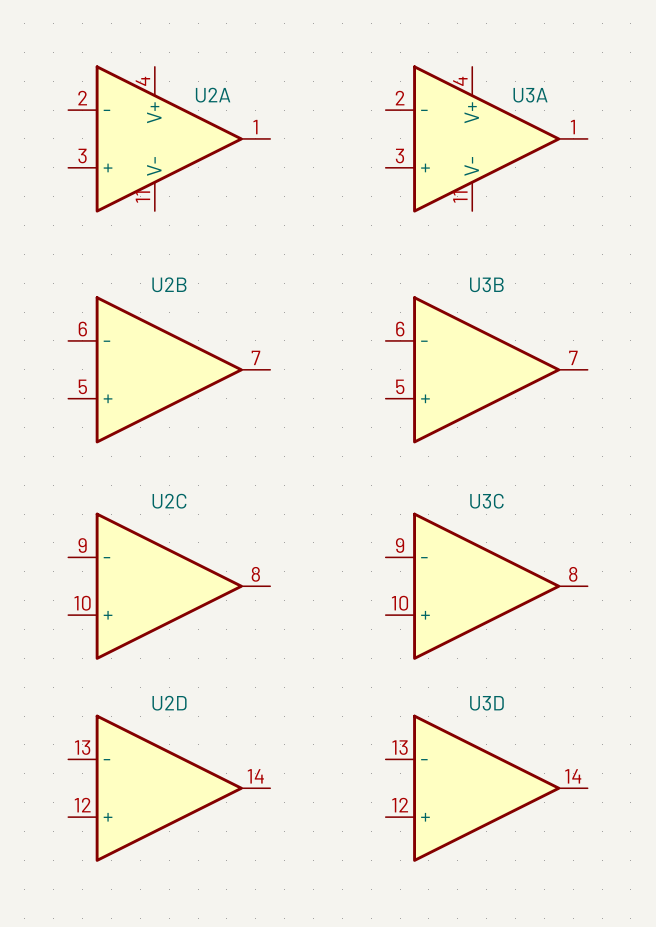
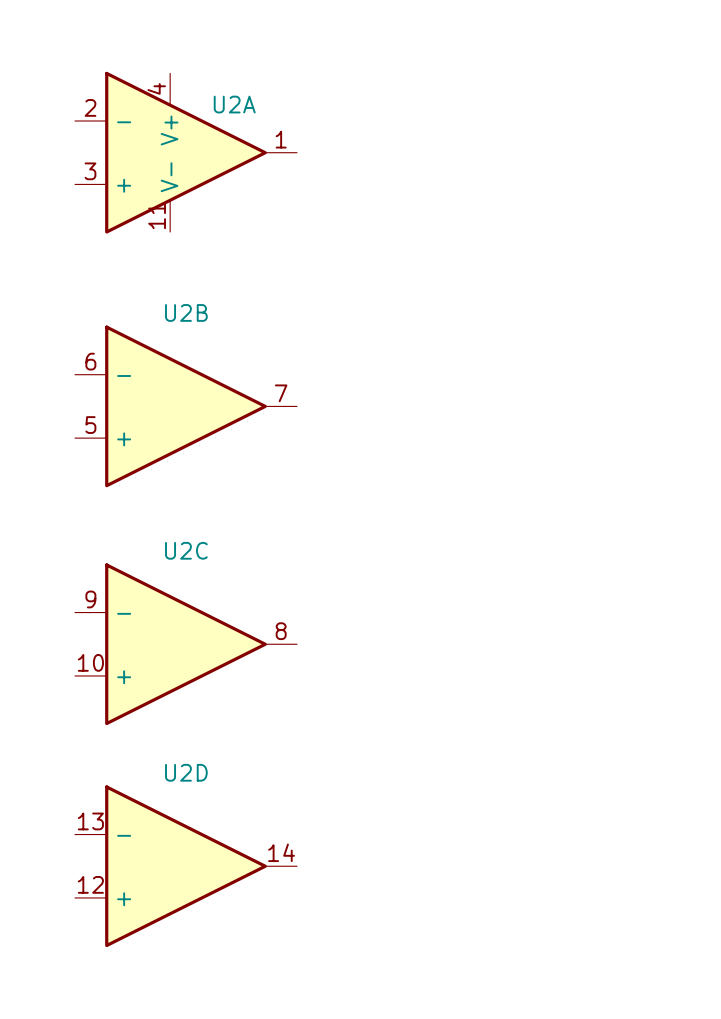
U3A: (486, 138) -> none
U3B: (486, 369) -> none
U3C: (486, 586) -> none
U3D: (486, 788) -> none

